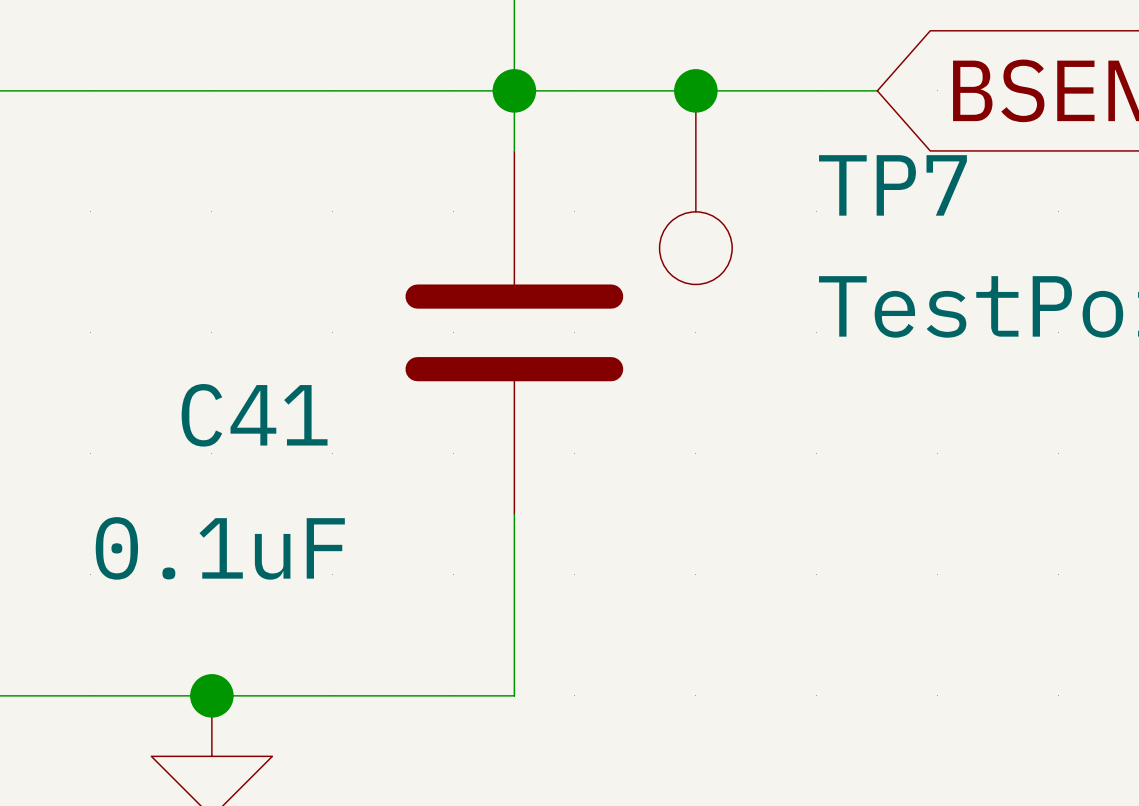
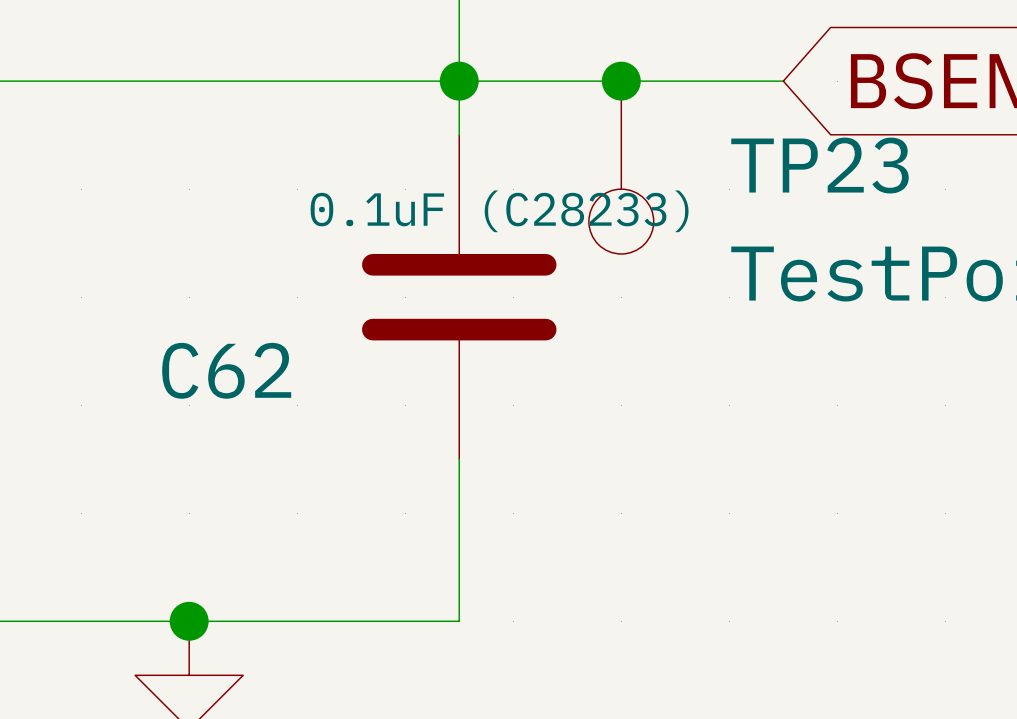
TP7 name: TP7 (892, 185) -> TP23 (820, 165)
C41 name: C41 (254, 415) -> C62 (226, 370)
C41 value: 0.1uF (220, 548) -> 0.1uF (C28233) (499, 211)

